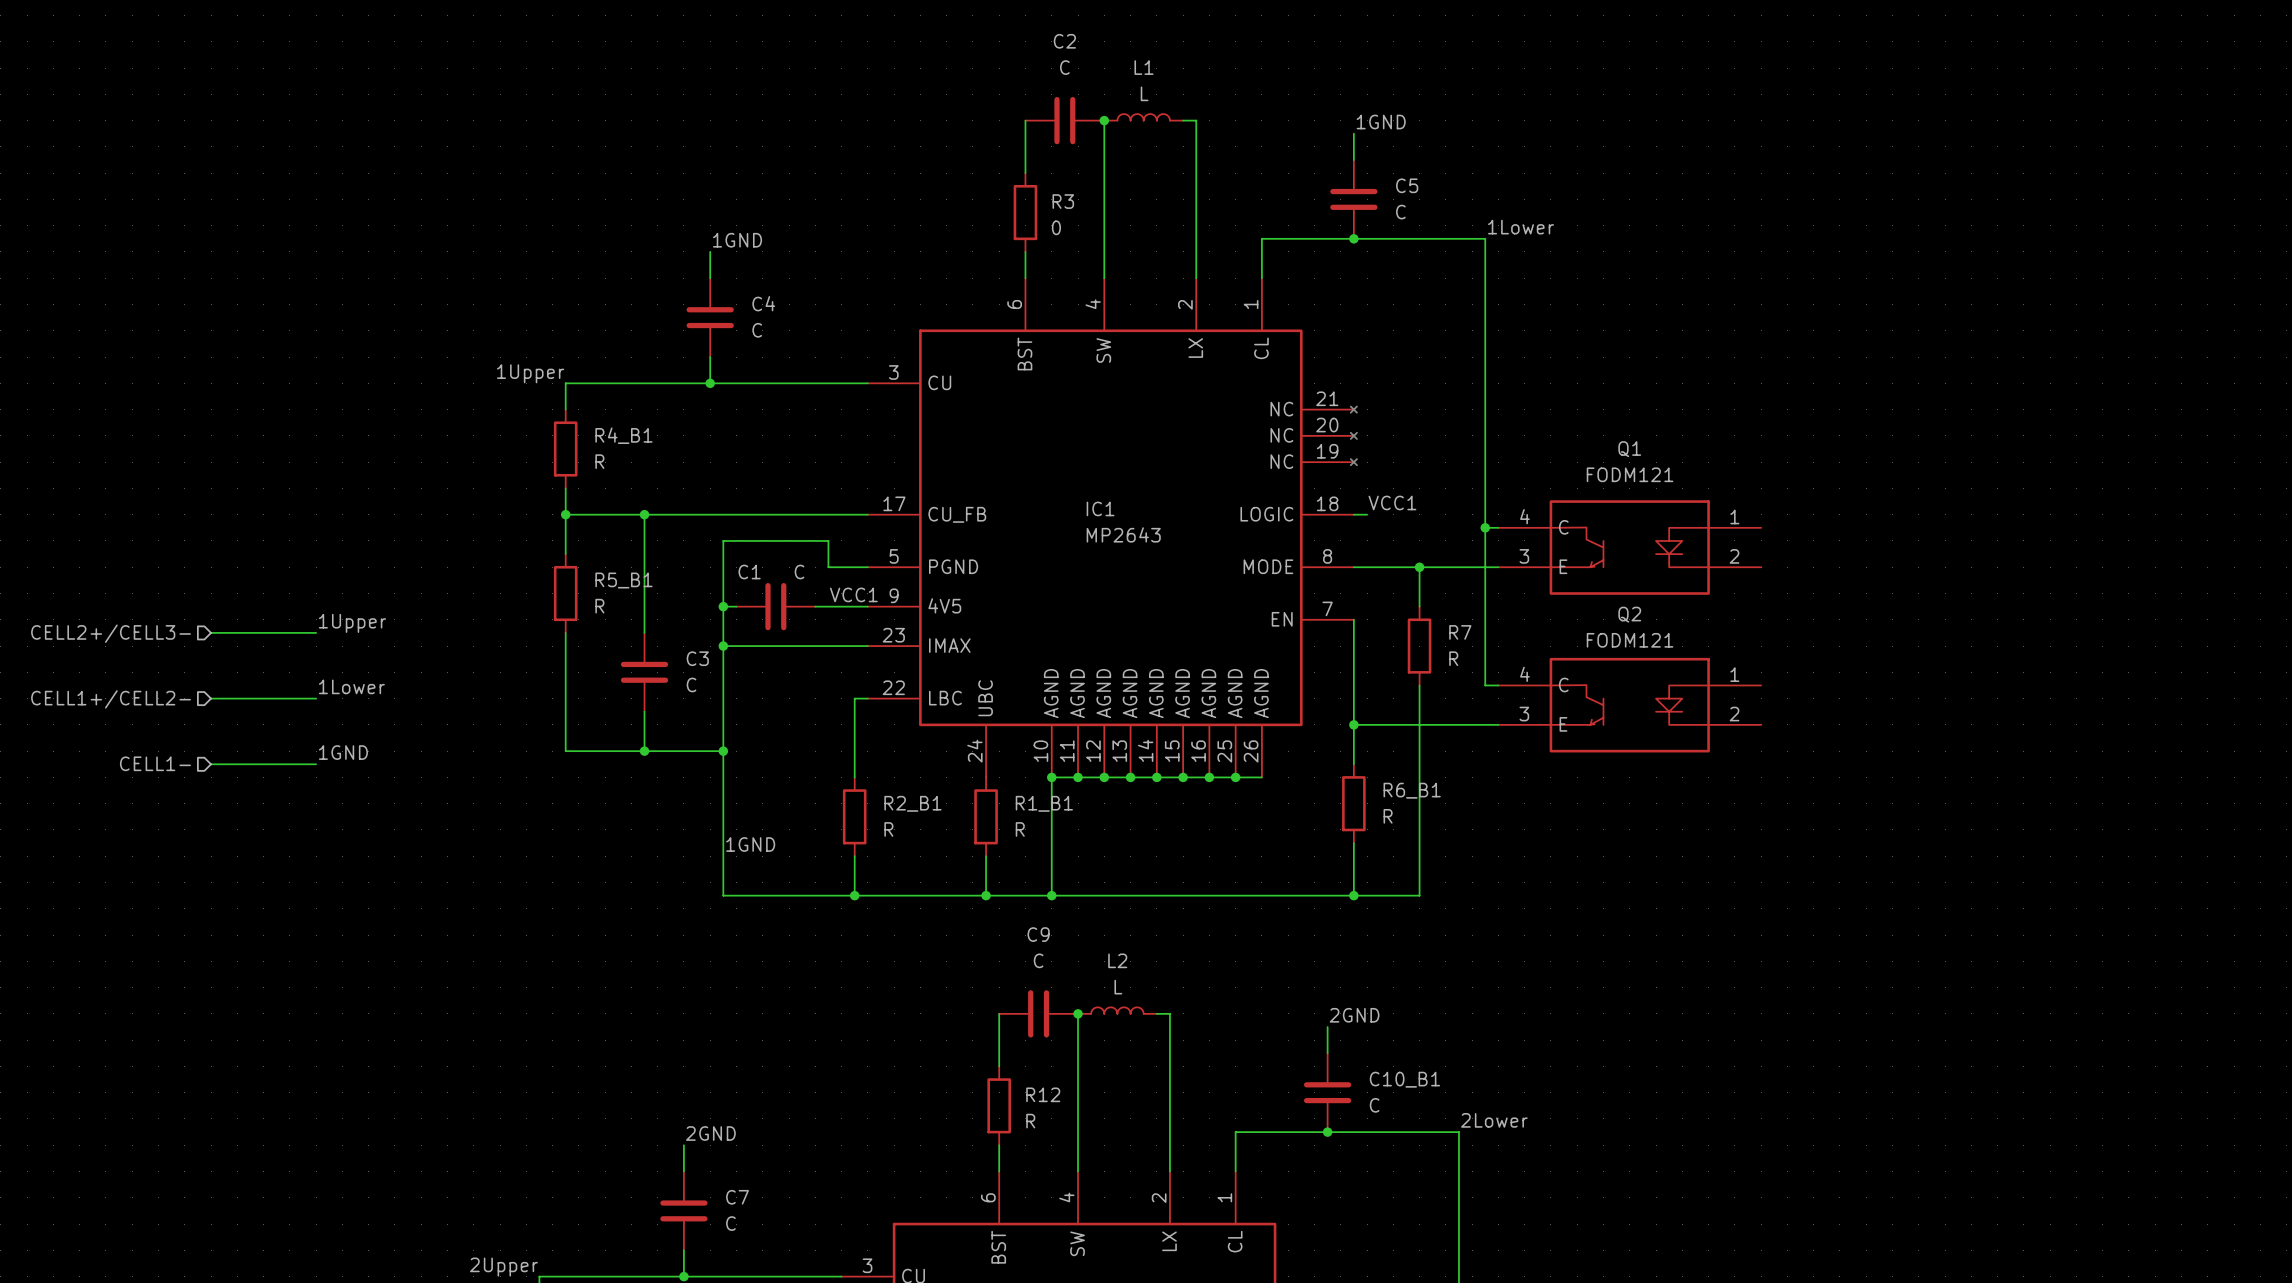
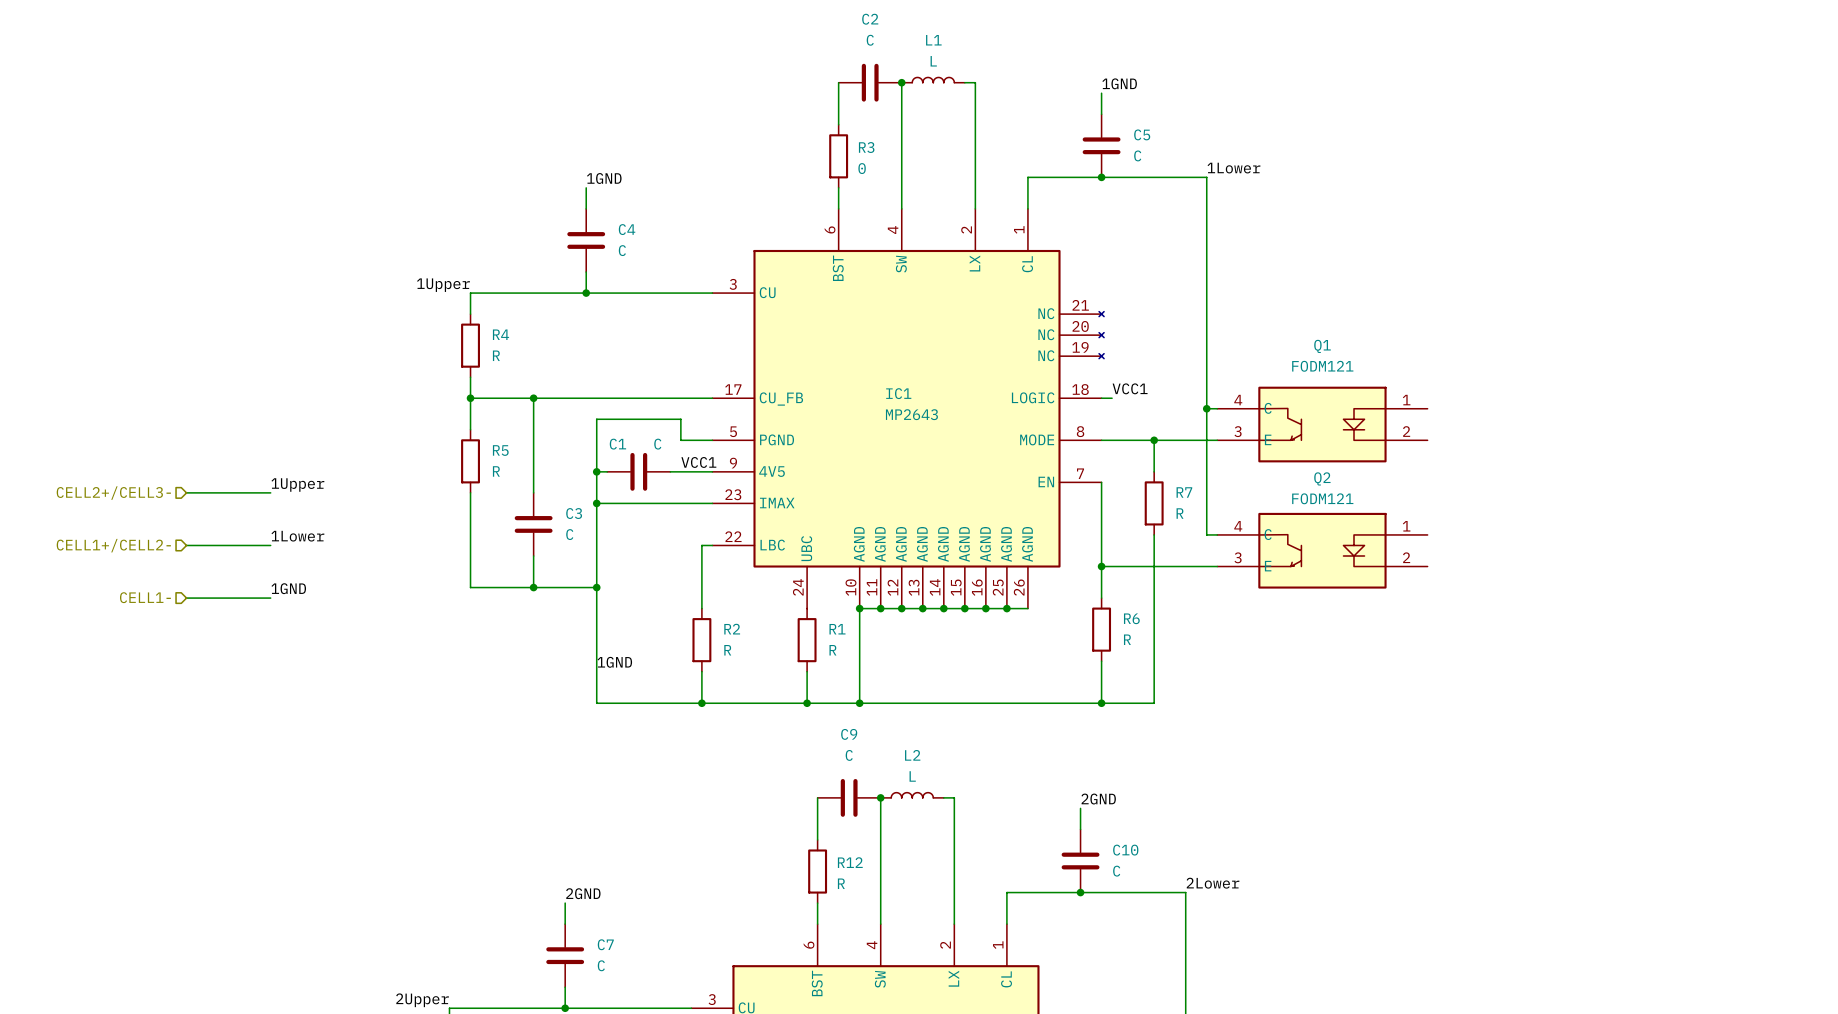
R4_B1 name: R4_B1 (623, 435) -> R4 (500, 334)
R5_B1 name: R5_B1 (623, 580) -> R5 (500, 450)
R6_B1 name: R6_B1 (1412, 790) -> R6 (1131, 618)
R2_B1 name: R2_B1 (912, 803) -> R2 (732, 629)
R1_B1 name: R1_B1 (1044, 803) -> R1 (837, 629)
C10_B1 name: C10_B1 (1404, 1079) -> C10 (1125, 850)

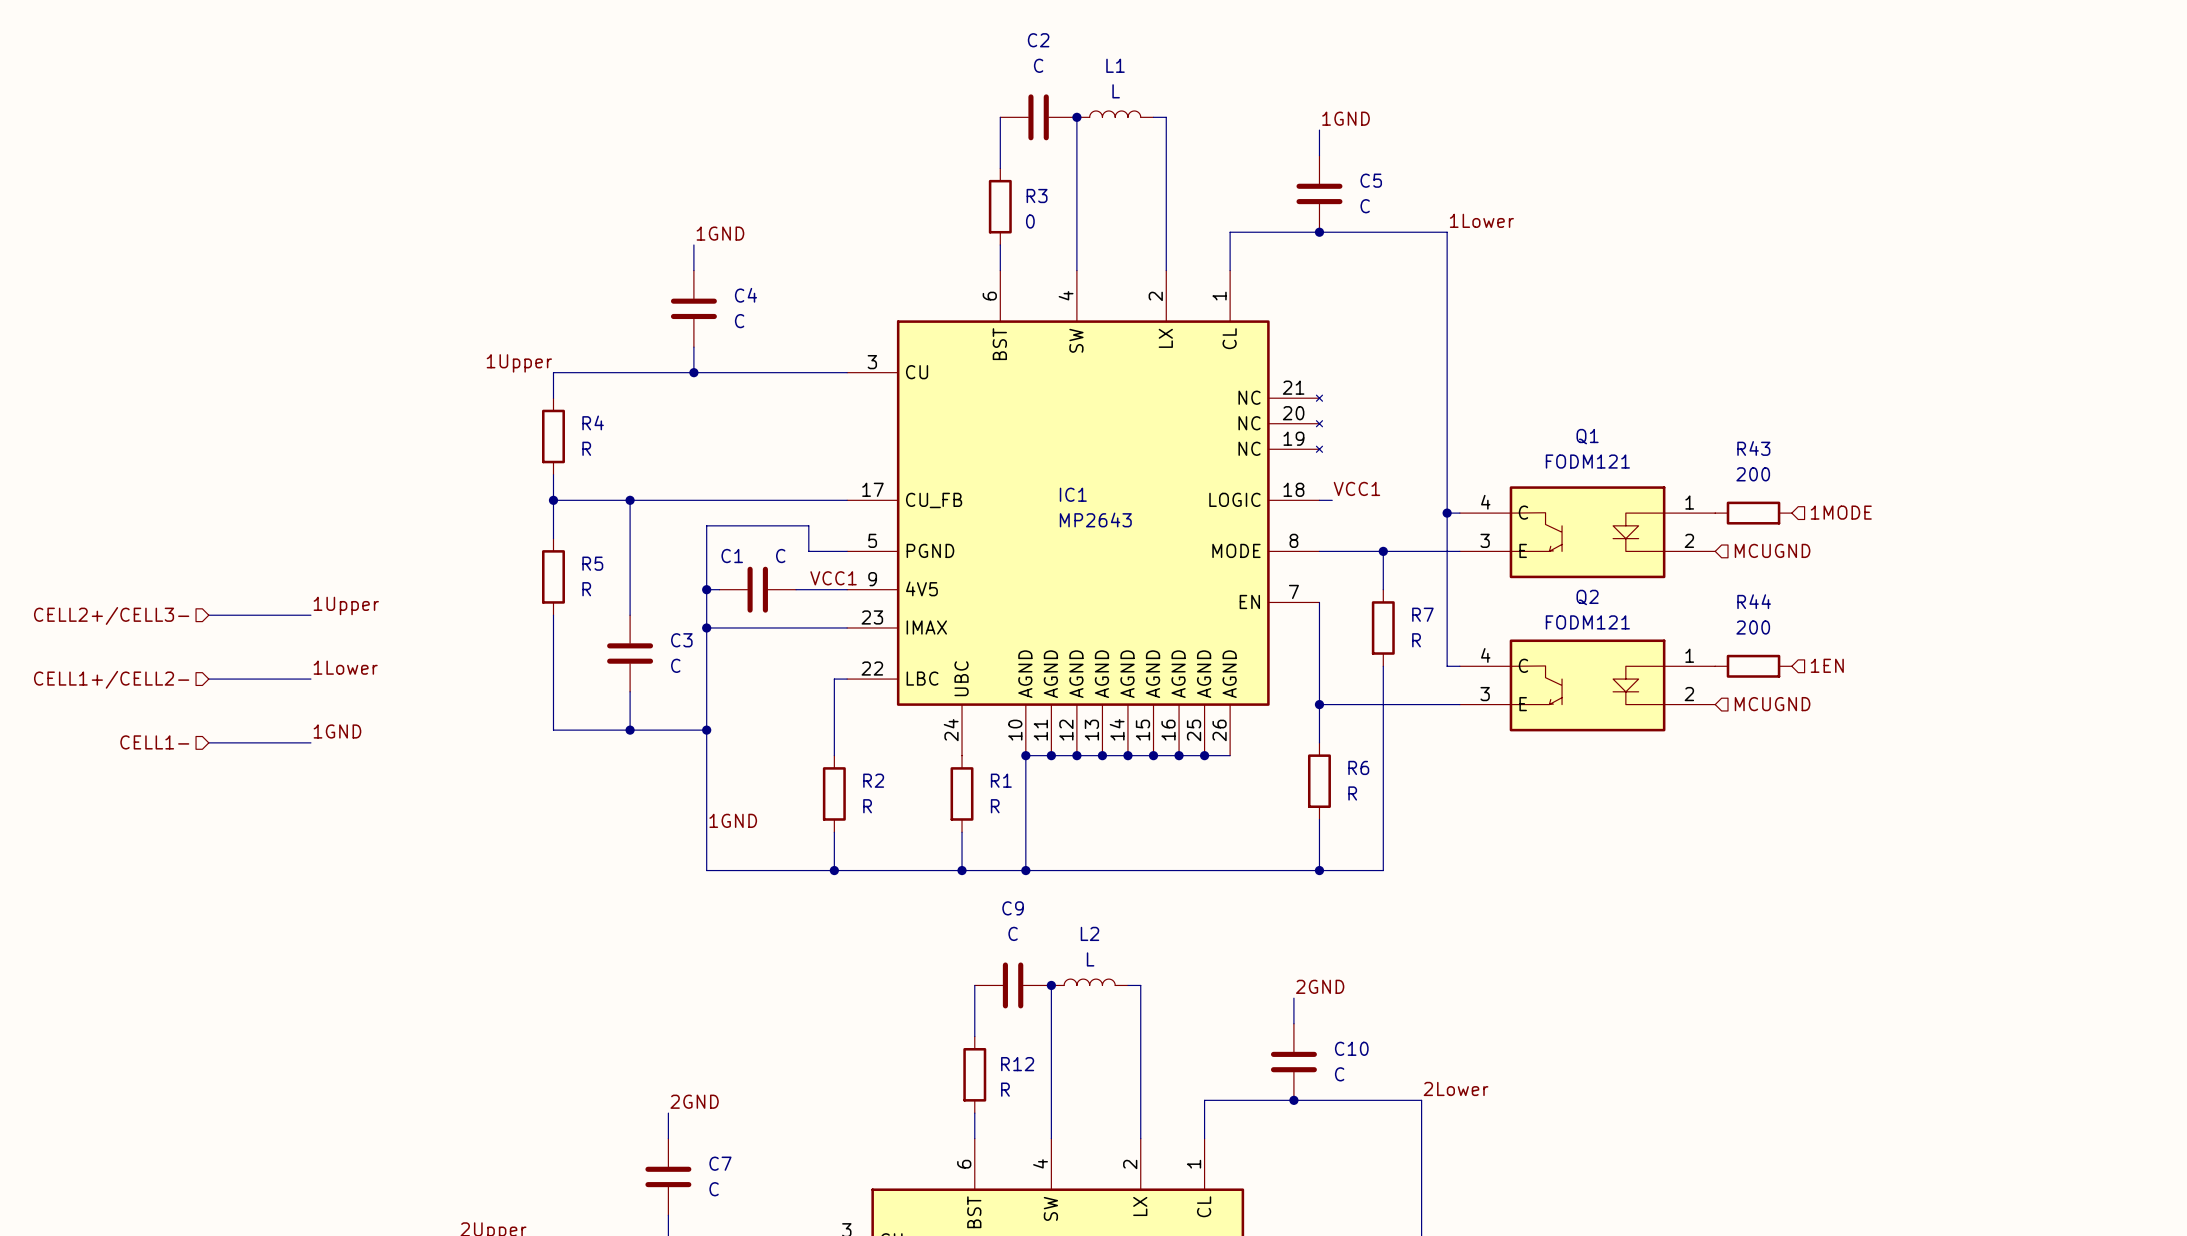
R43: none -> 200 (1753, 513)
hierarchical label: none -> 1MODE (1841, 512)
hierarchical label: none -> MCUGND (1772, 550)
R44: none -> 200 (1753, 666)
hierarchical label: none -> 1EN (1827, 665)
hierarchical label: none -> MCUGND (1772, 704)

